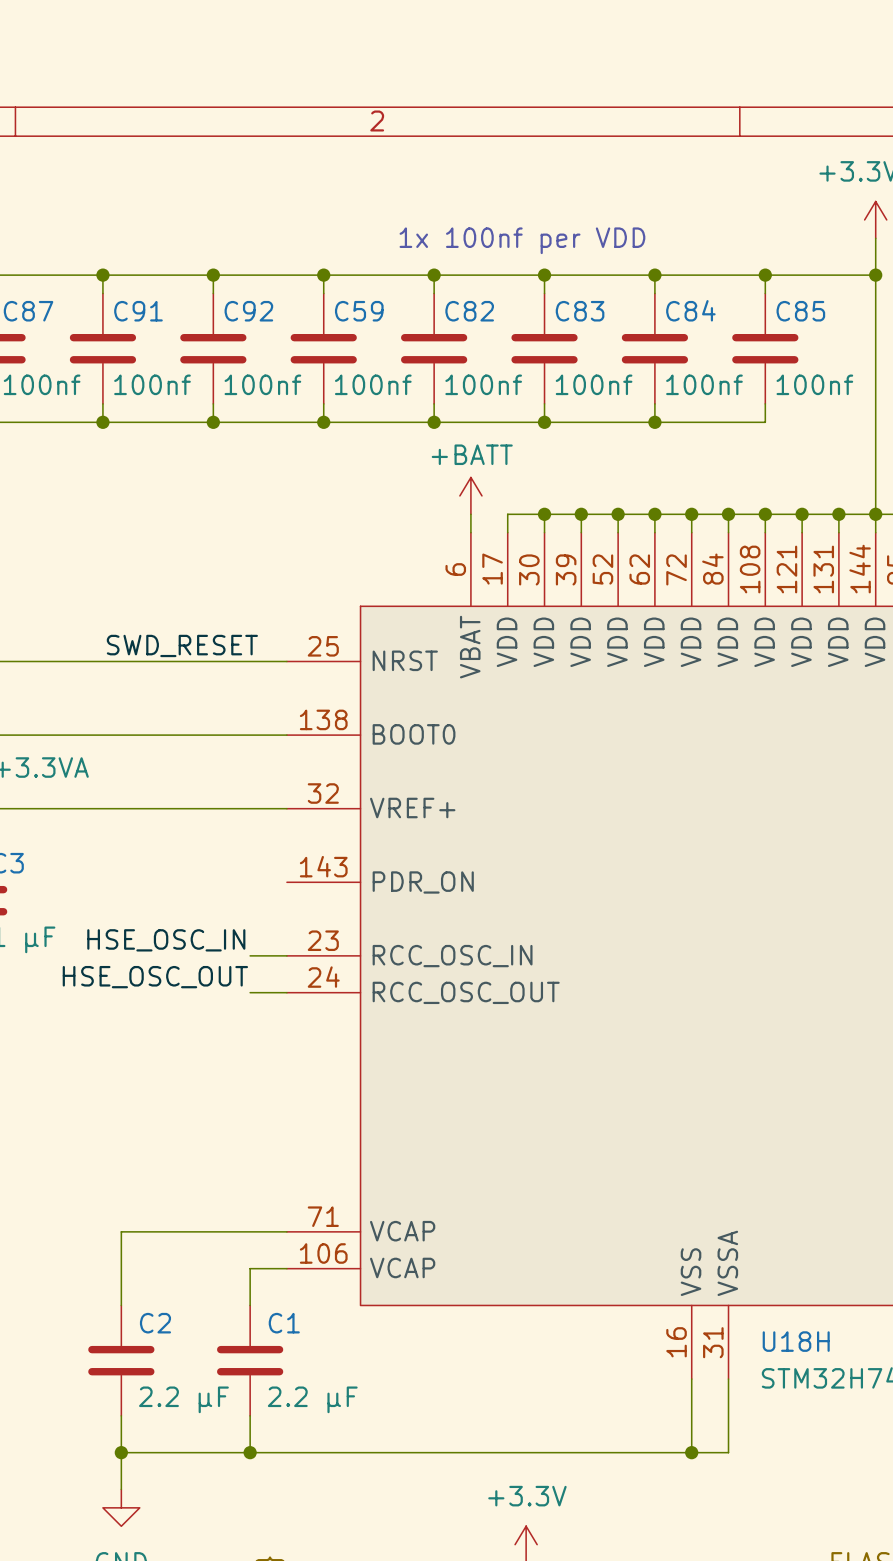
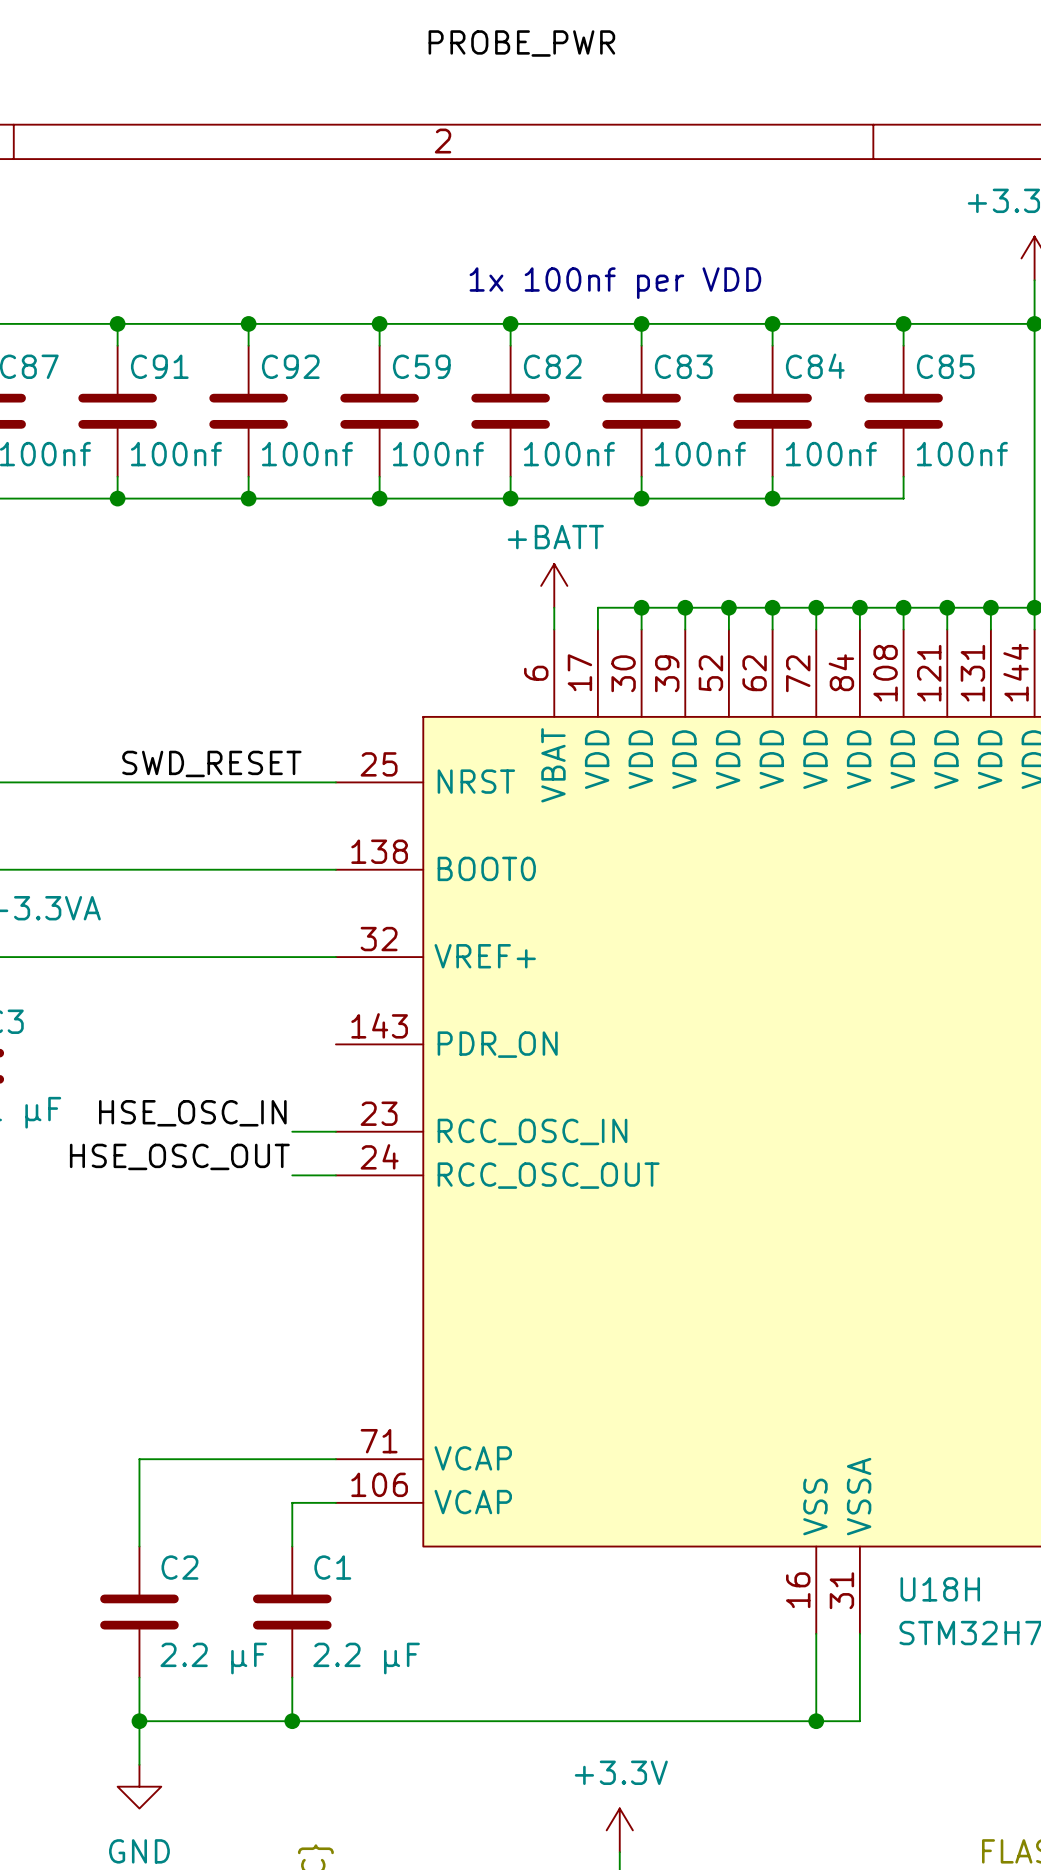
label: none -> PROBE_PWR (521, 43)

